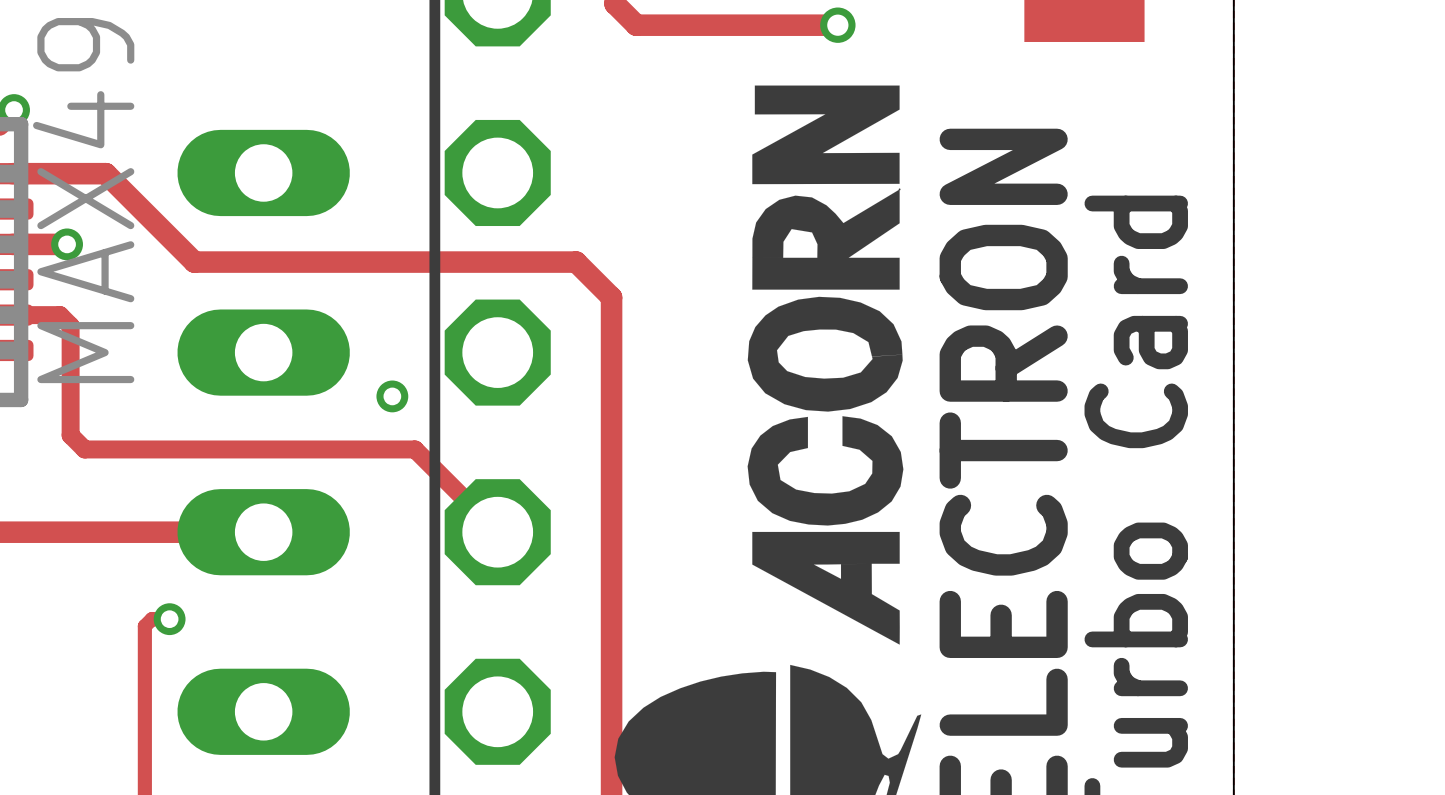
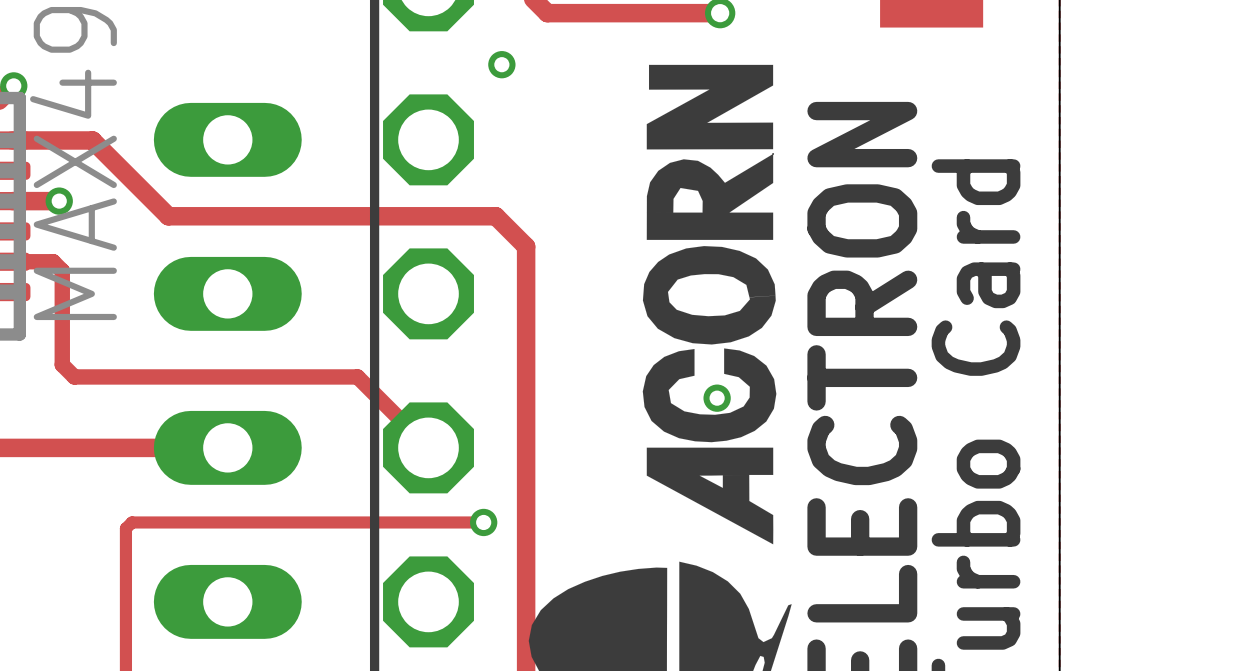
via: none -> (501, 64)
via: (392, 396) -> none
via: none -> (717, 398)
track: none -> (147, 522) (483, 522)
via: (169, 619) -> none
via: none -> (483, 522)

